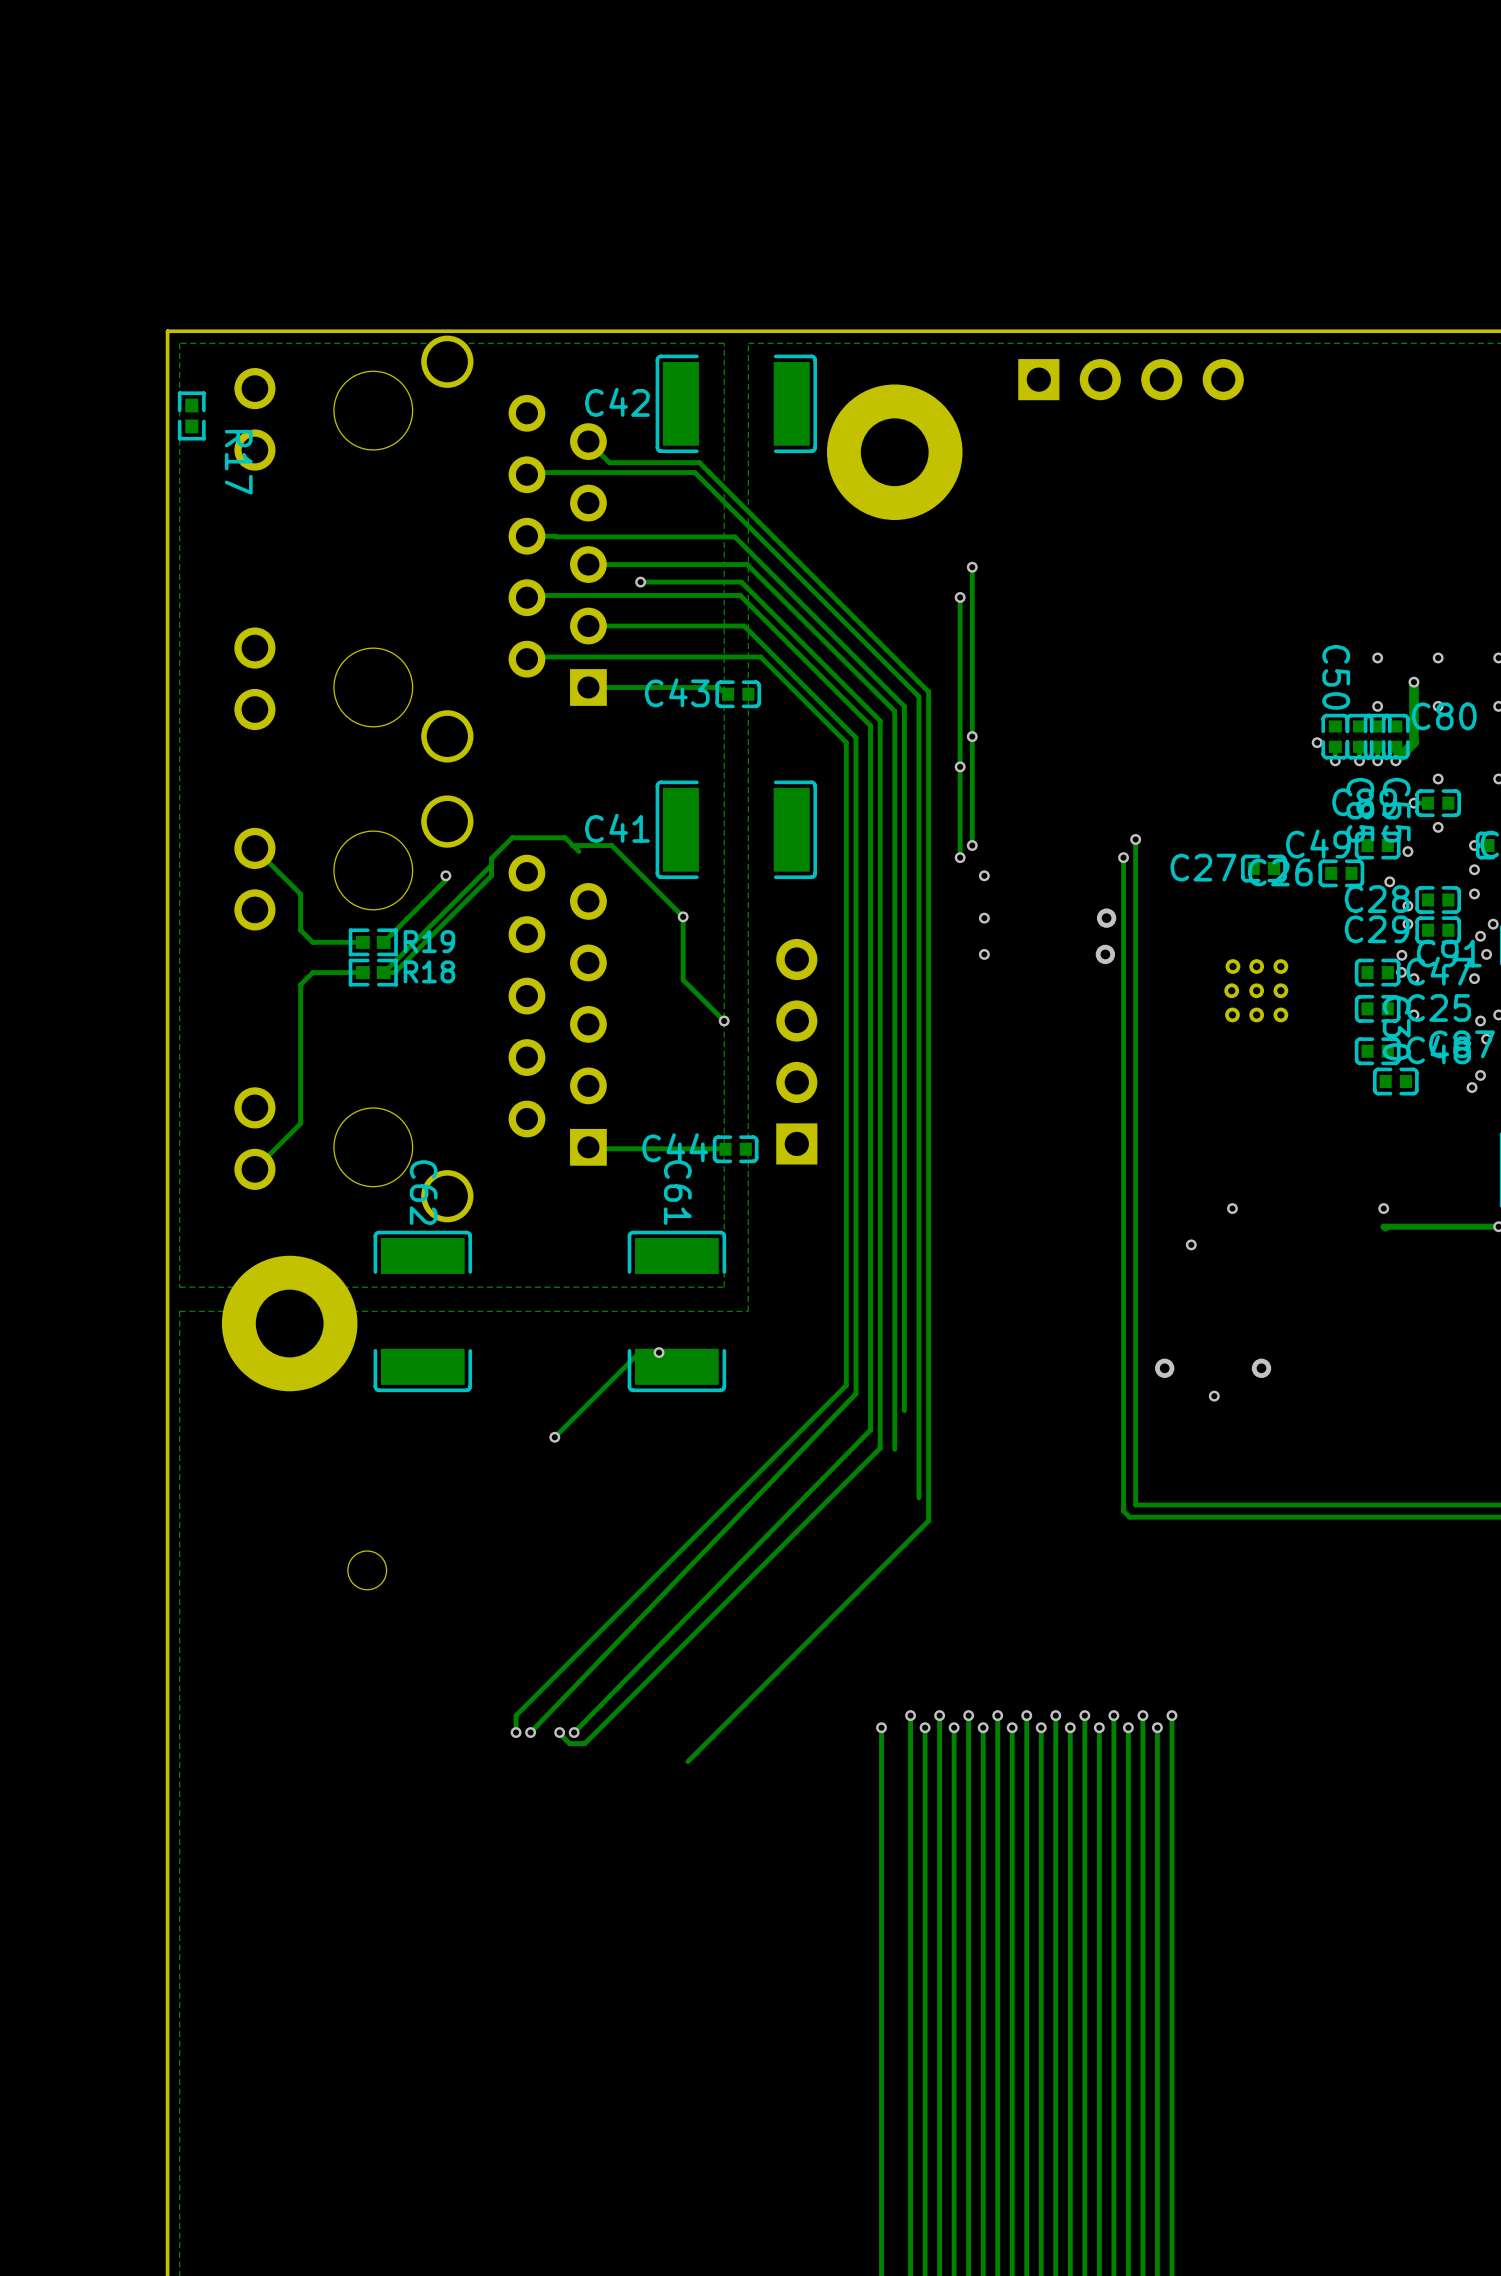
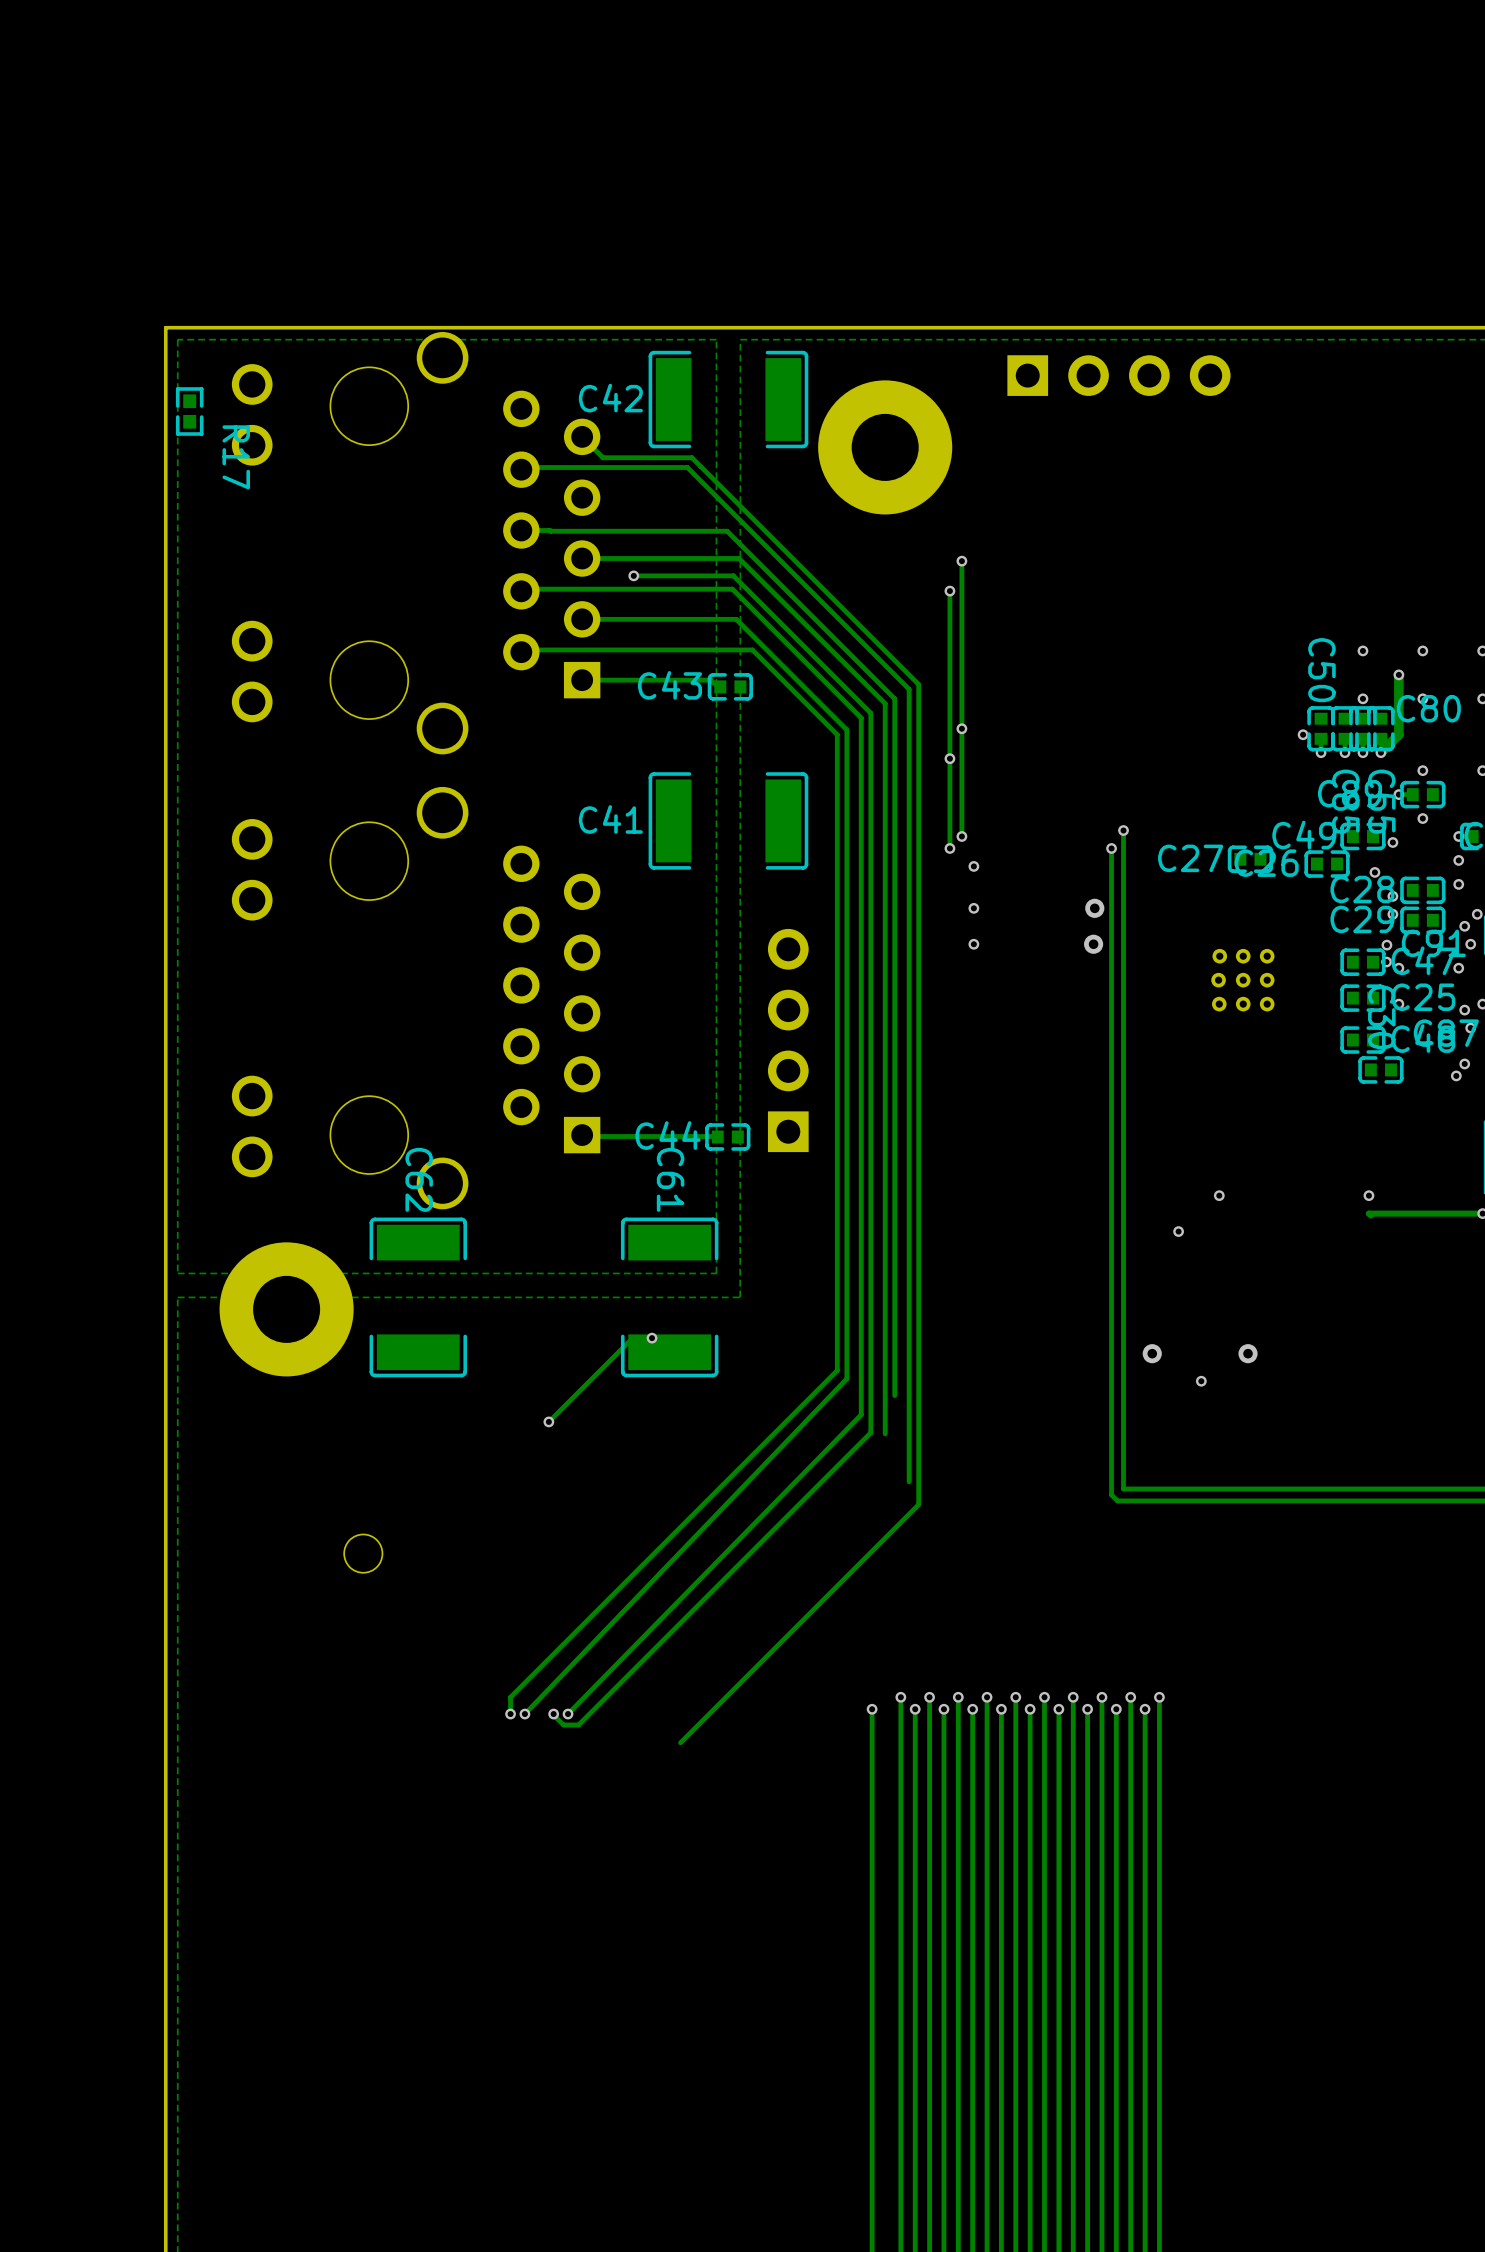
track: (572, 845) (611, 845) (683, 916) (683, 979) (724, 1020) -> none
track: (254, 848) (300, 894) (300, 930) (312, 942) (362, 942) -> none
track: (579, 851) (565, 837) (512, 837) (491, 858) (491, 875) (394, 972) (383, 972) -> none
track: (490, 866) (384, 972) -> none
track: (445, 875) (445, 880) (383, 942) (387, 942) -> none
via: (445, 875) -> none
via: (683, 916) -> none
R19: (373, 942) -> none
track: (362, 972) (312, 972) (300, 984) (300, 1123) (254, 1169) -> none
R18: (373, 972) -> none
via: (724, 1020) -> none

